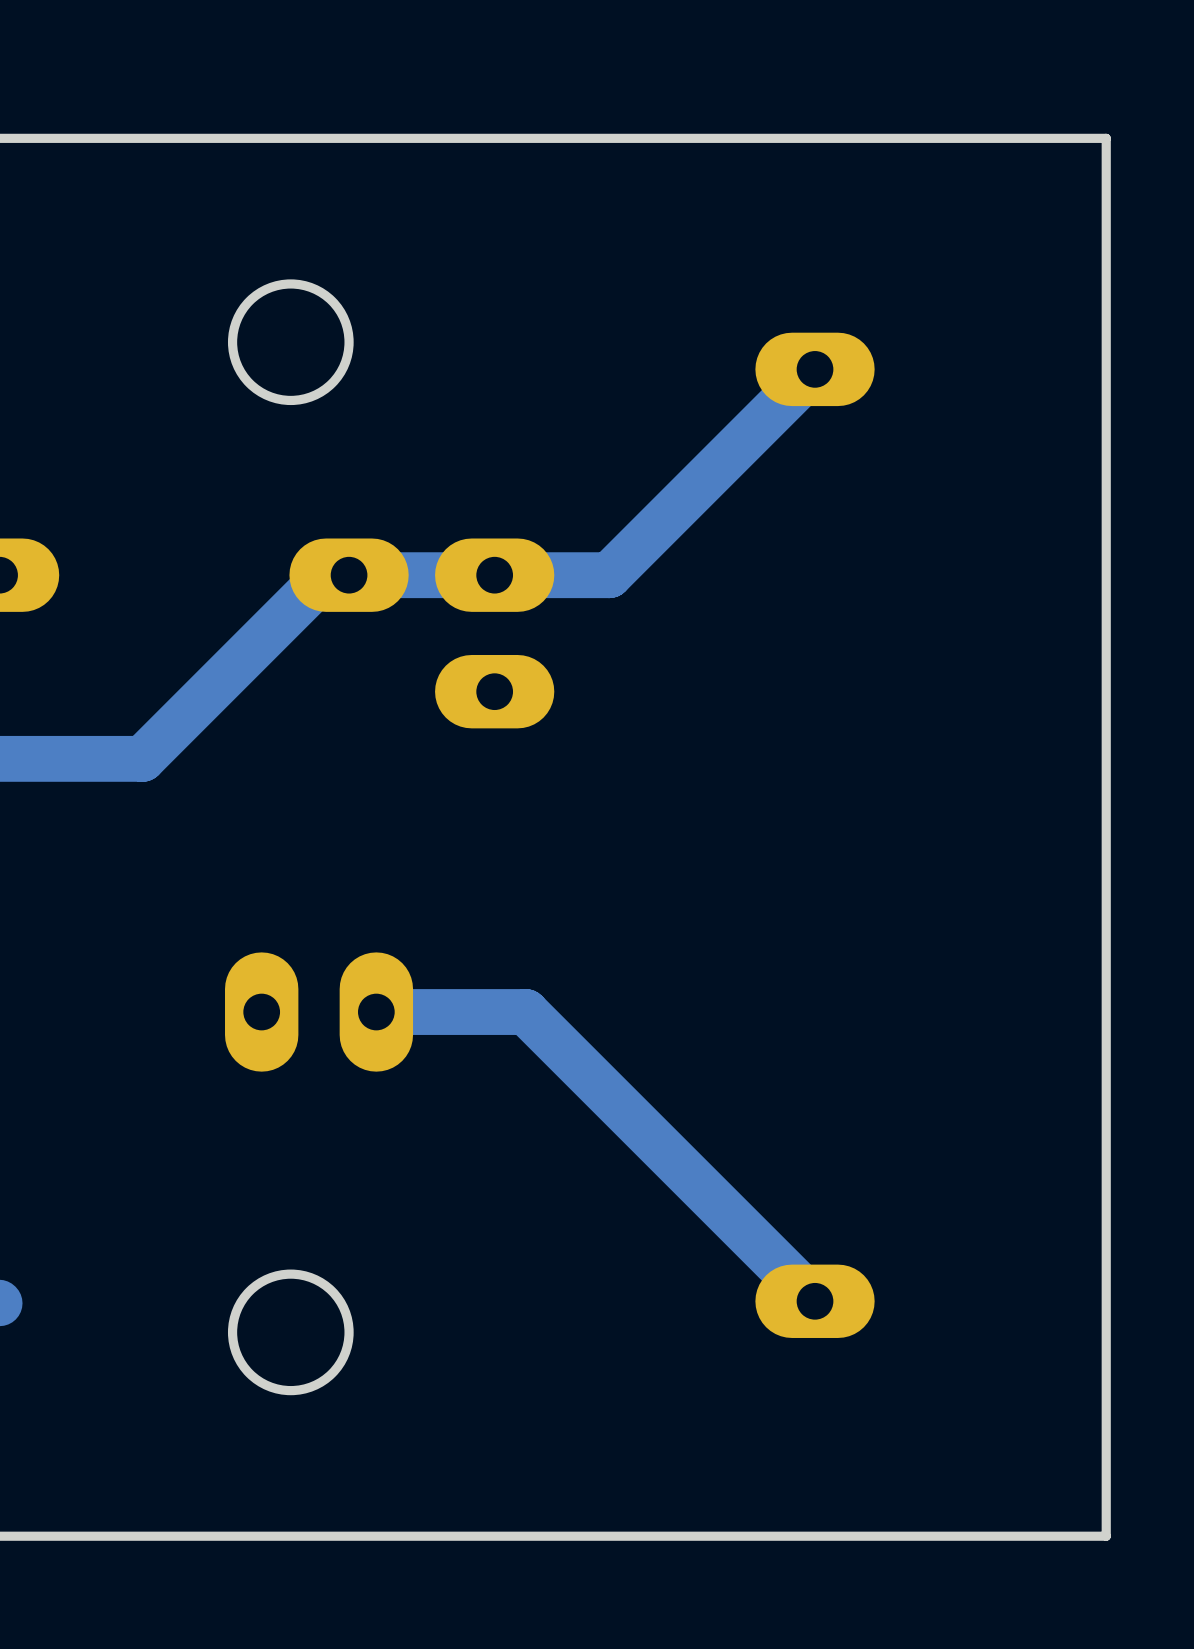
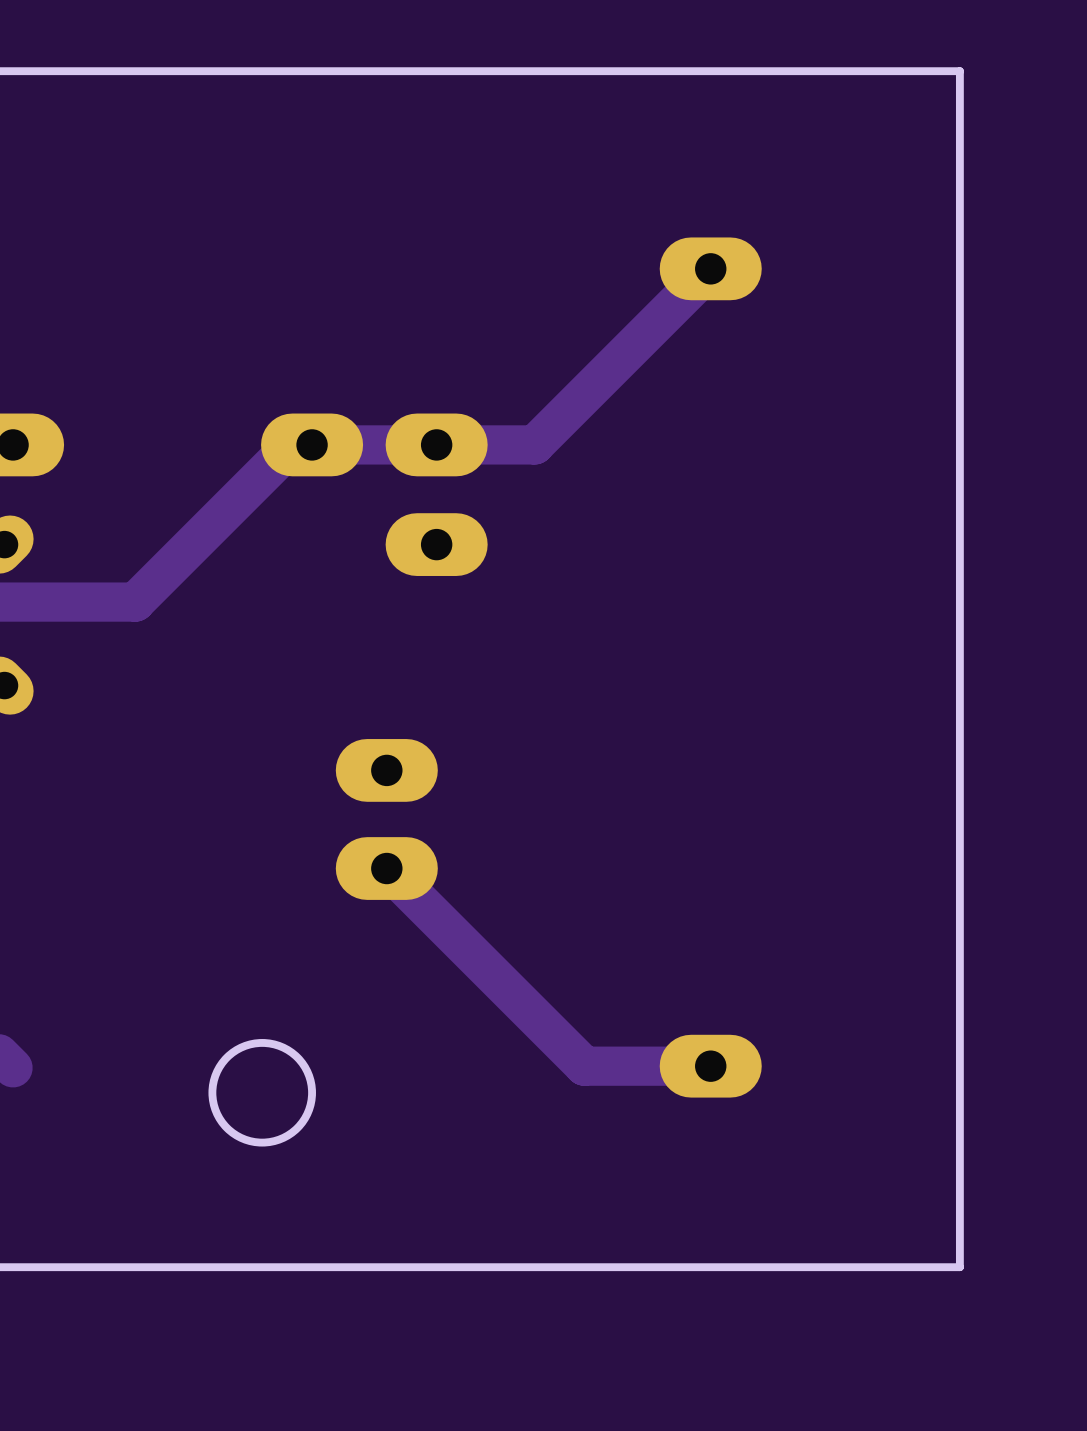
round board edge: [227, 279, 354, 406] -> none
part rotation: 0° (319, 1012) -> 90° clockwise (386, 819)
part position: (319, 1012) -> (386, 819)
track: (376, 1012) (525, 1012) (815, 1301) -> (386, 868) (584, 1066) (710, 1066)

